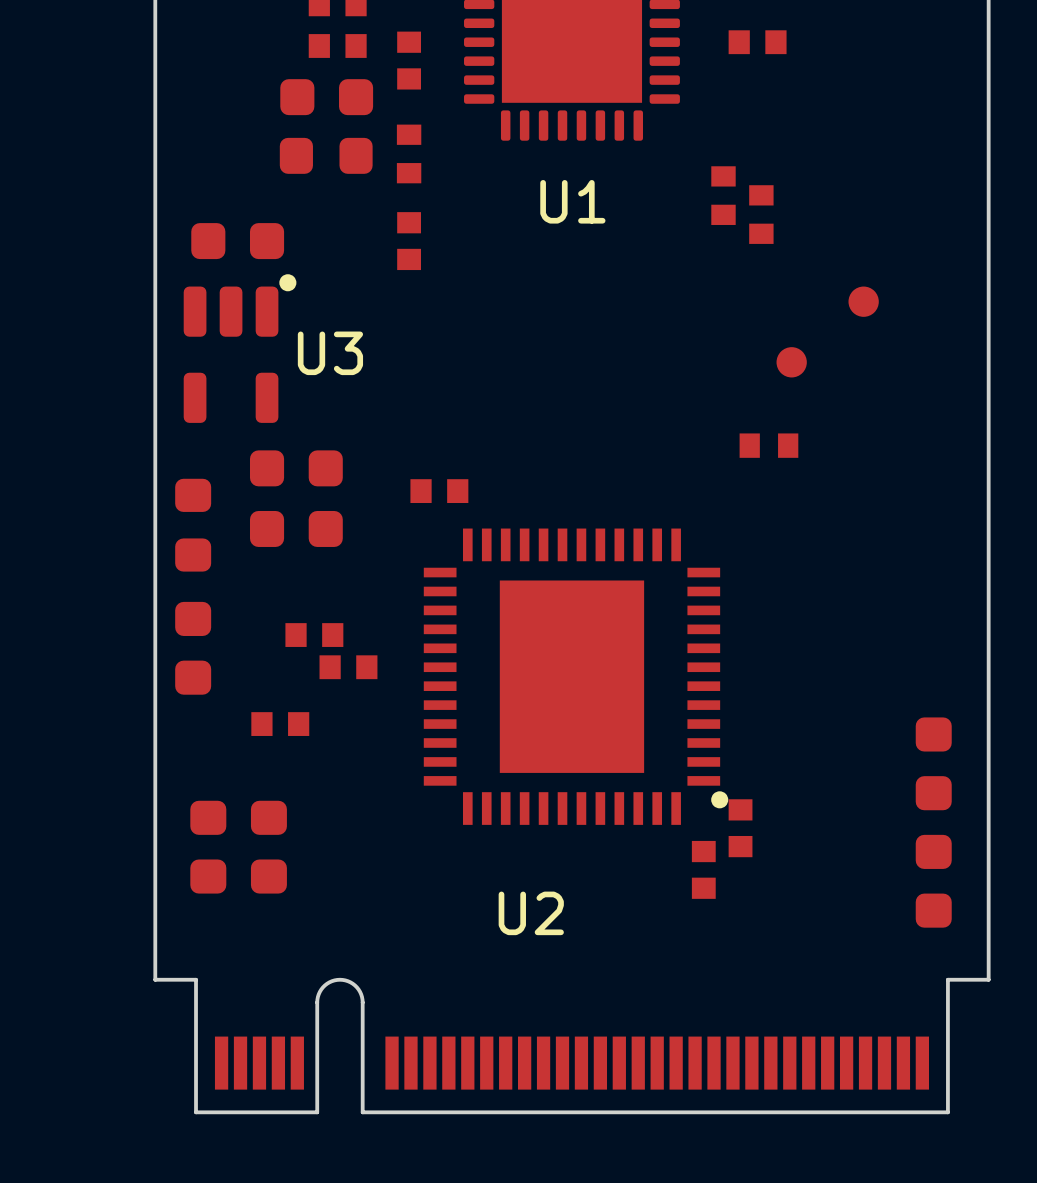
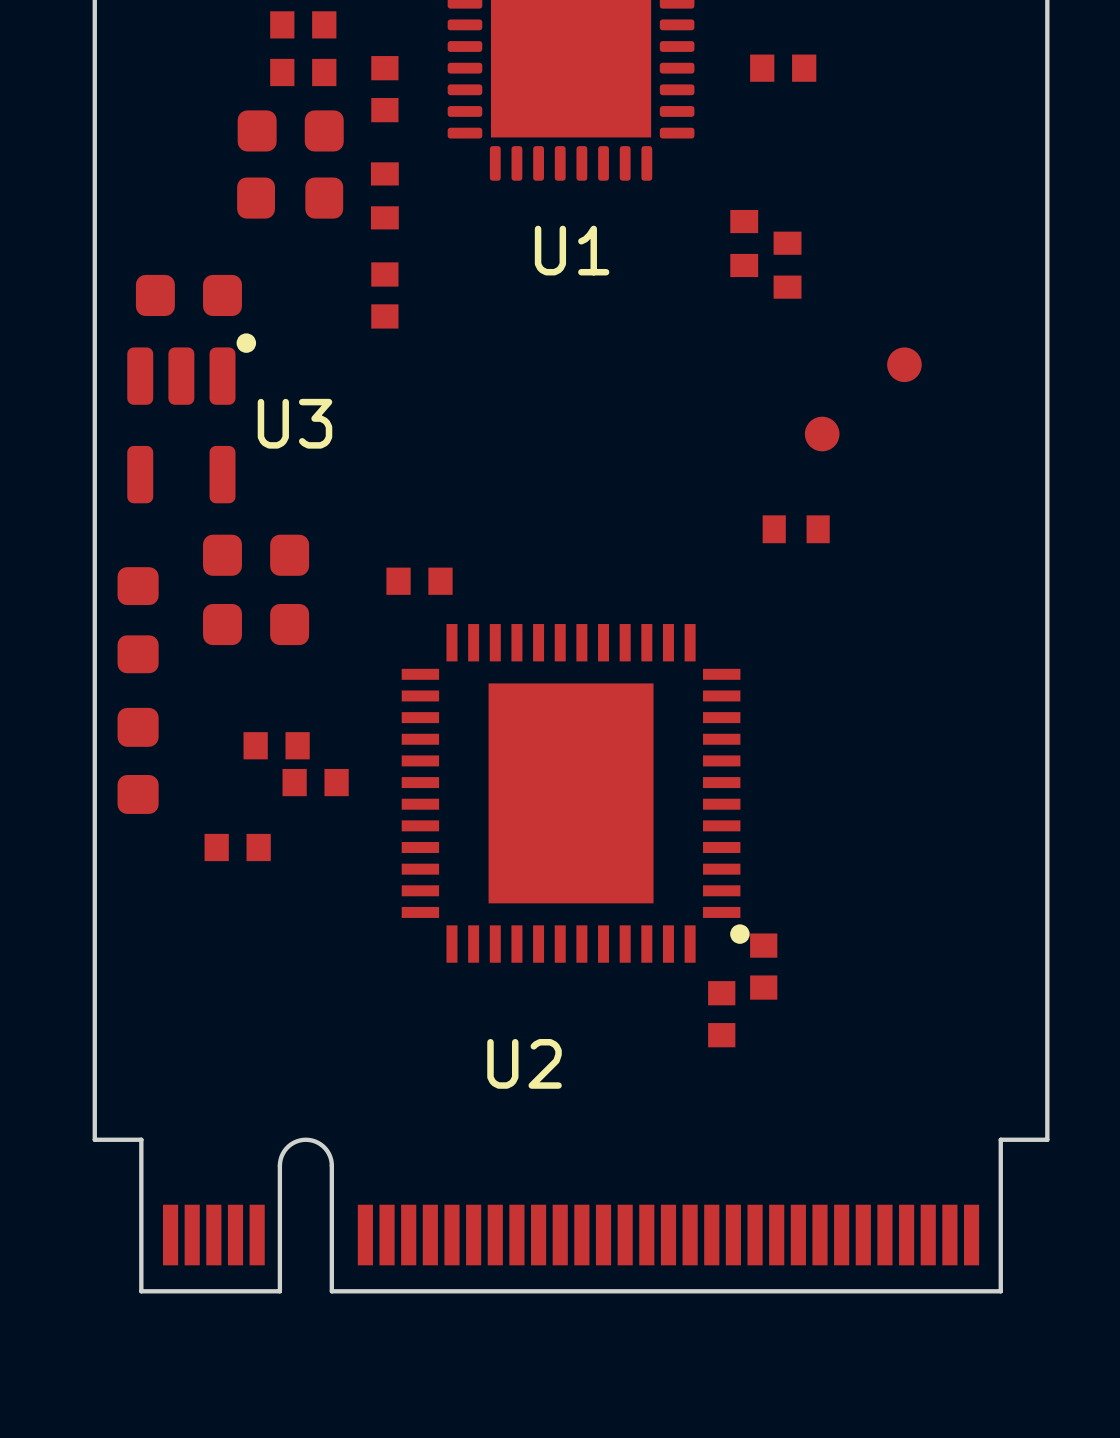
part: (933, 763) -> none
part: (208, 847) -> none
part: (268, 847) -> none
part: (933, 881) -> none

